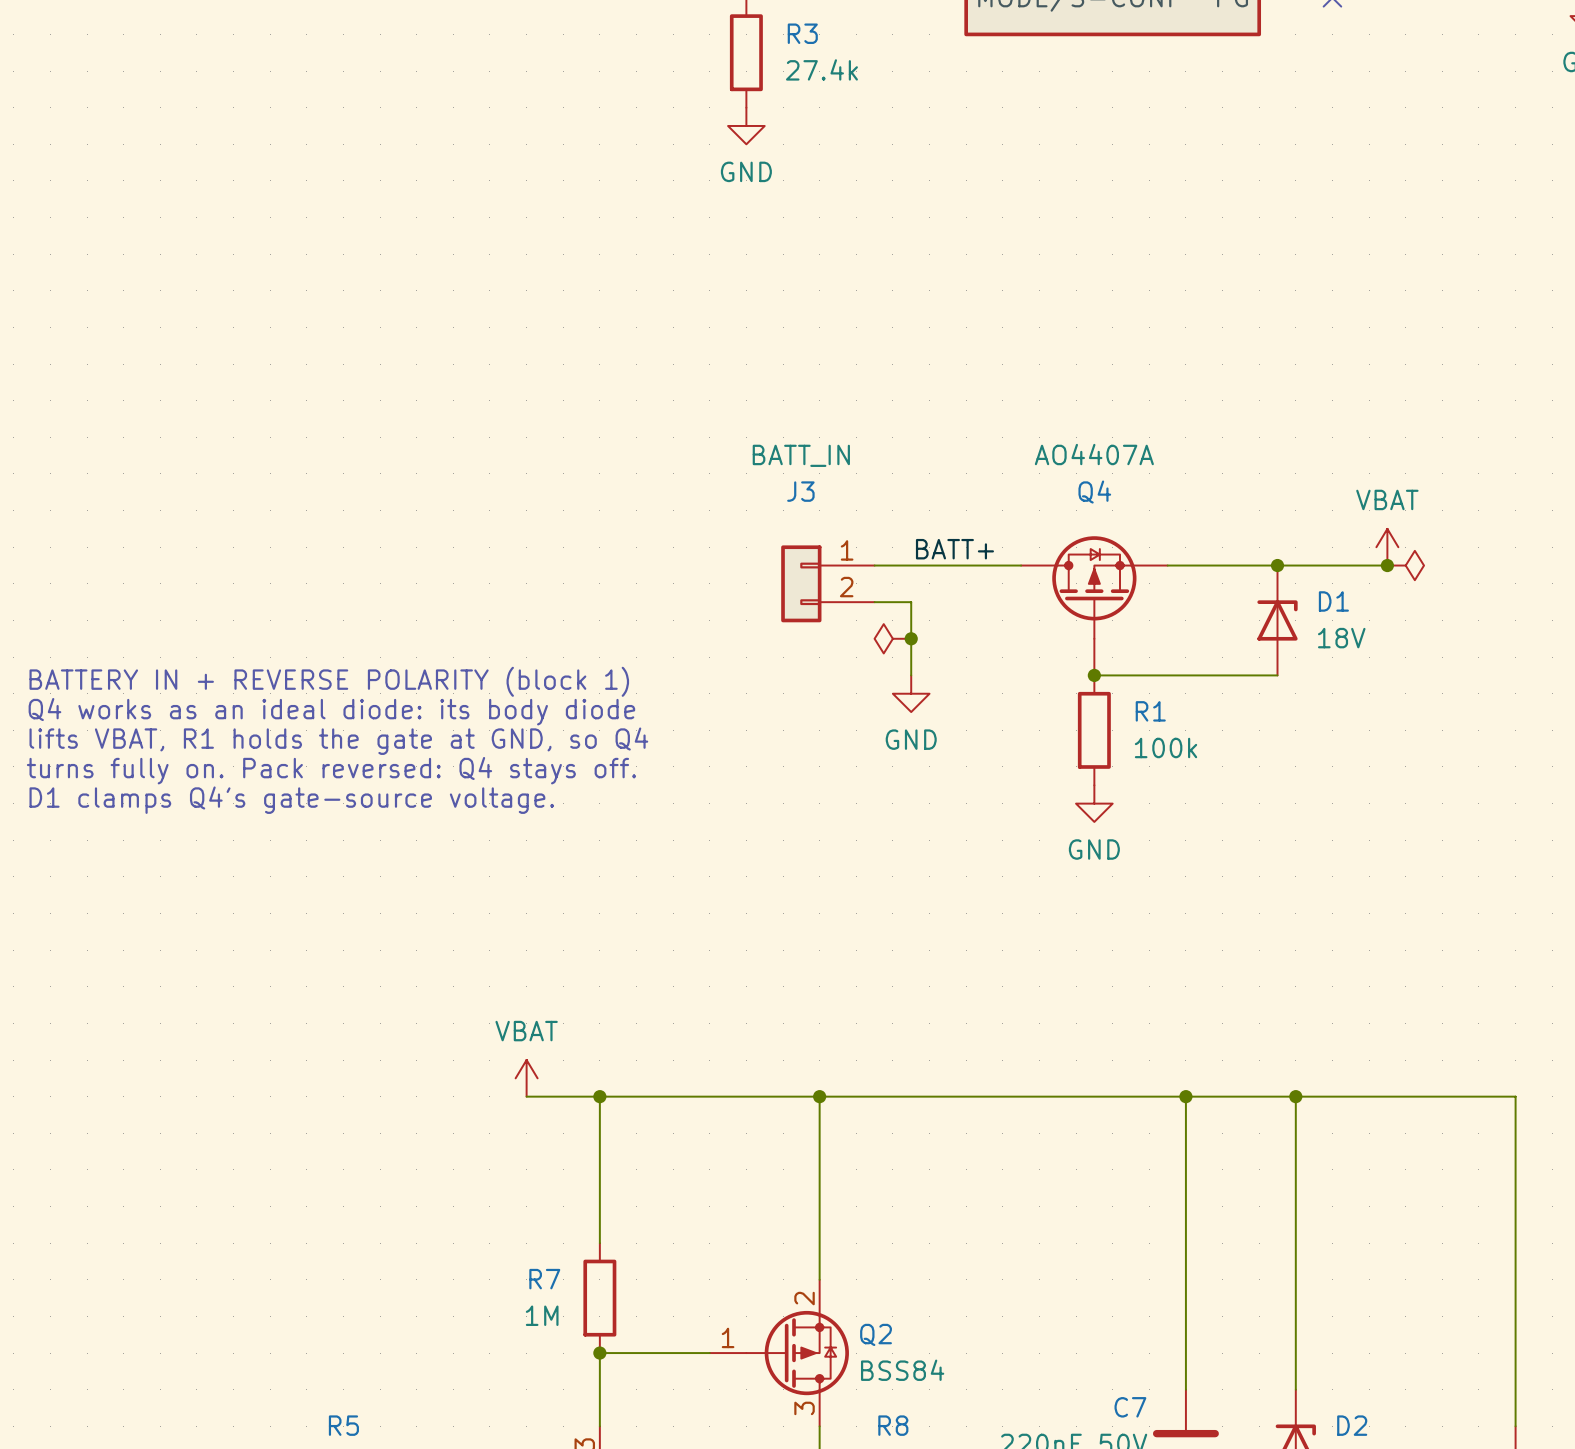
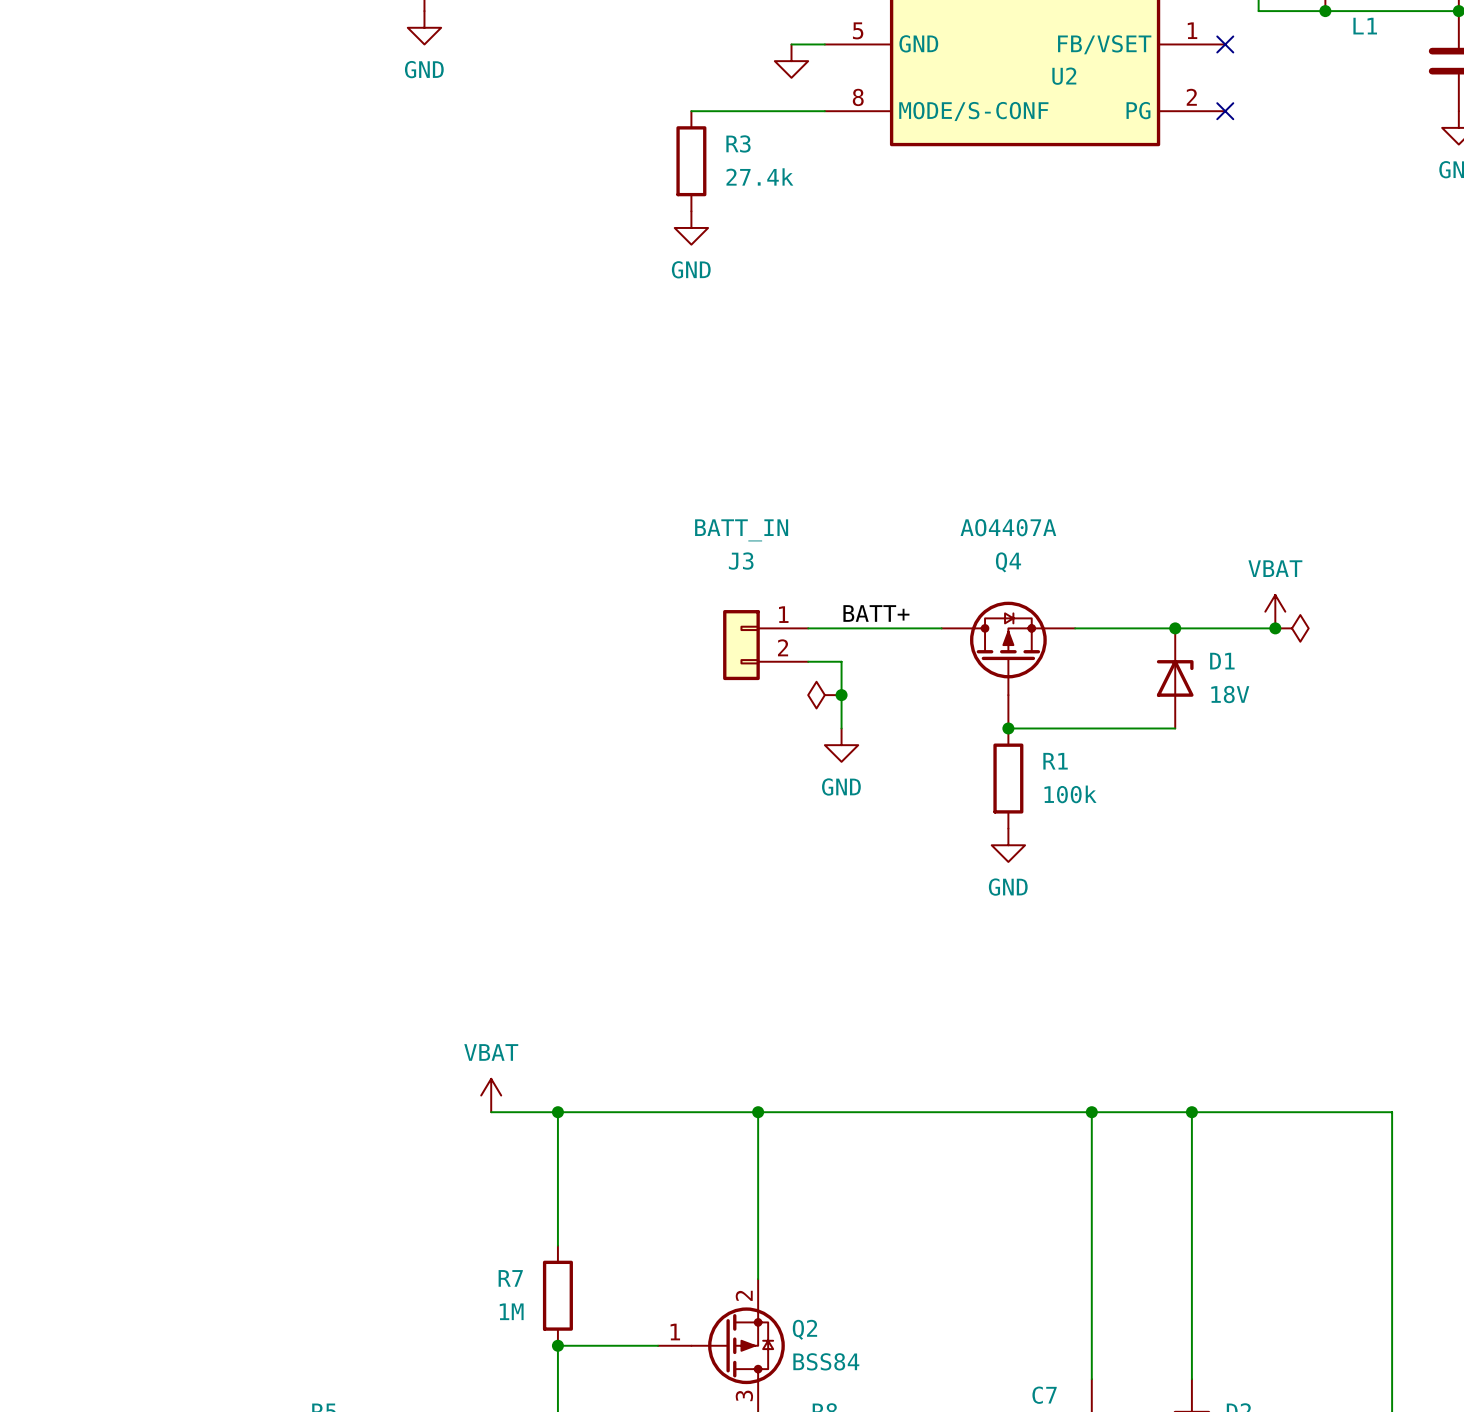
text: BATTERY IN + REVERSE POLARITY (block 1) (329, 681) -> none
text: Q4 works as an ideal diode: its body diode (331, 711) -> none
text: lifts VBAT, R1 holds the gate at GND, so Q4 (338, 741) -> none
text: turns fully on. Pack reversed: Q4 stays off. (331, 770) -> none
text: D1 clamps Q4's gate-source voltage. (291, 800) -> none

